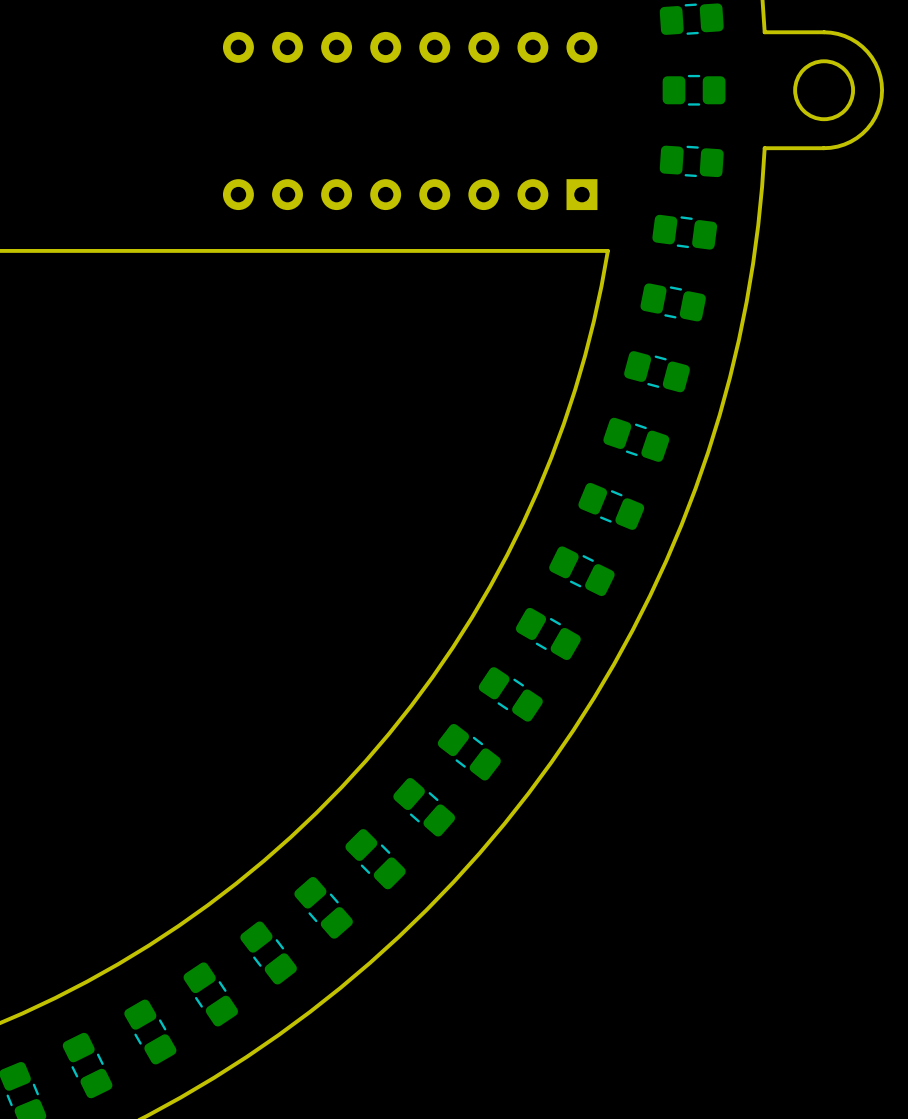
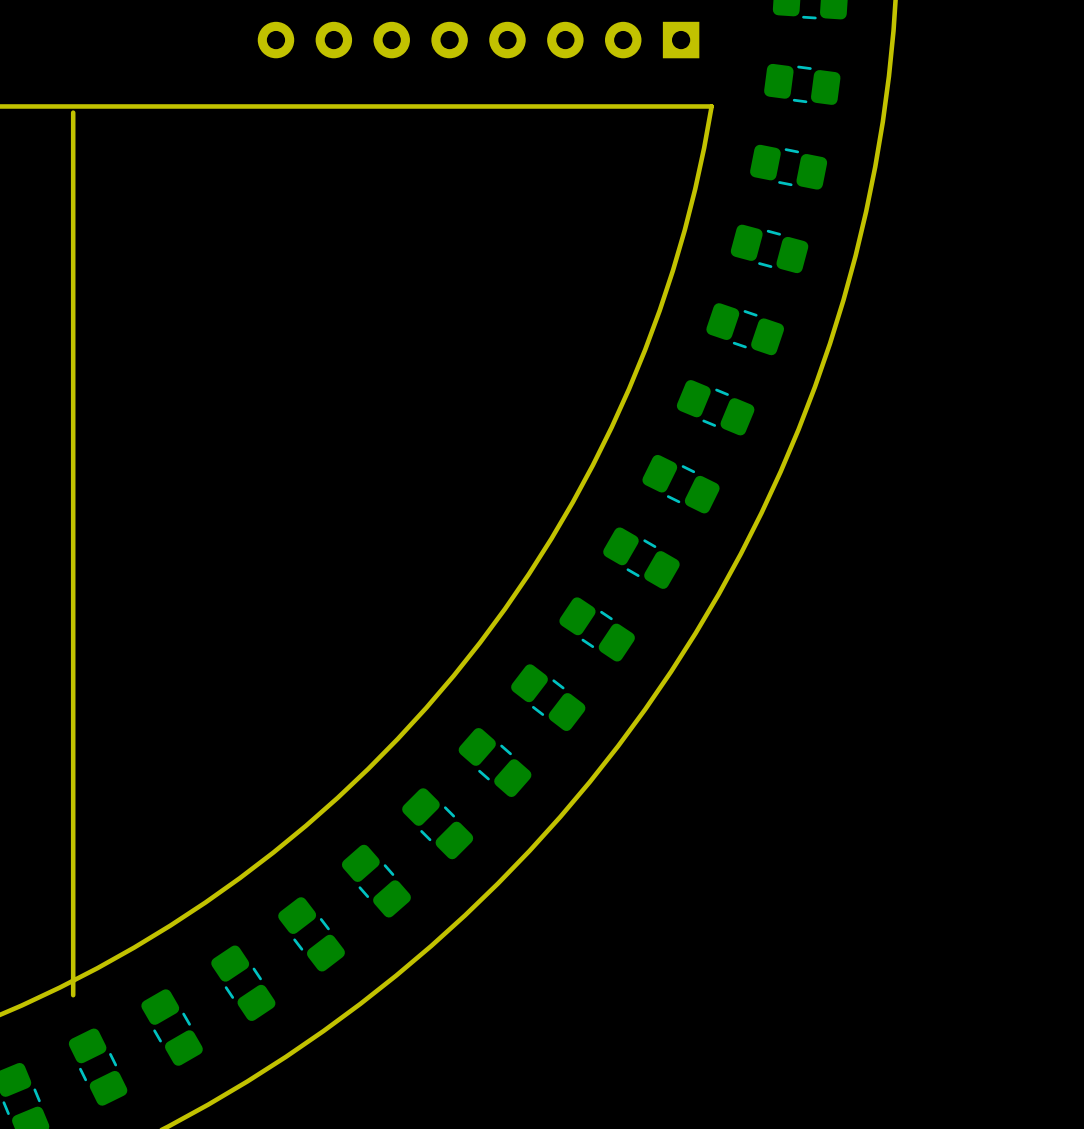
board edge: none -> (73, 112) (73, 995)

